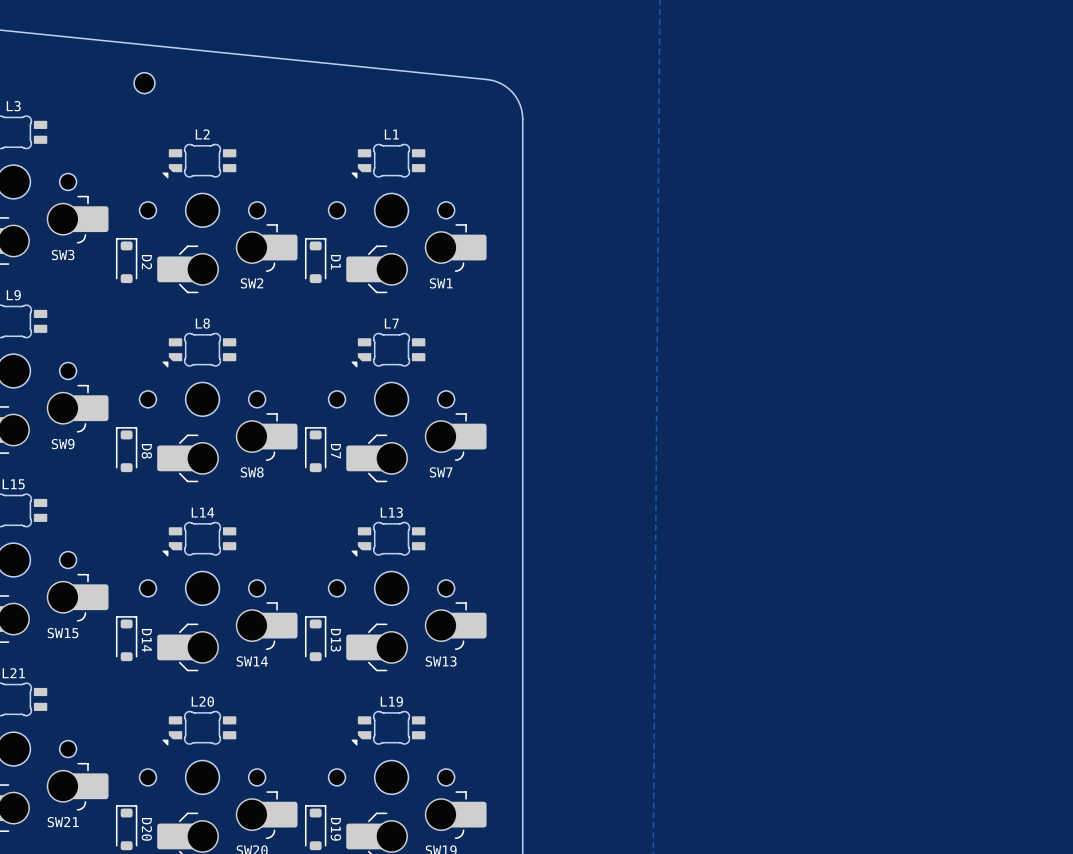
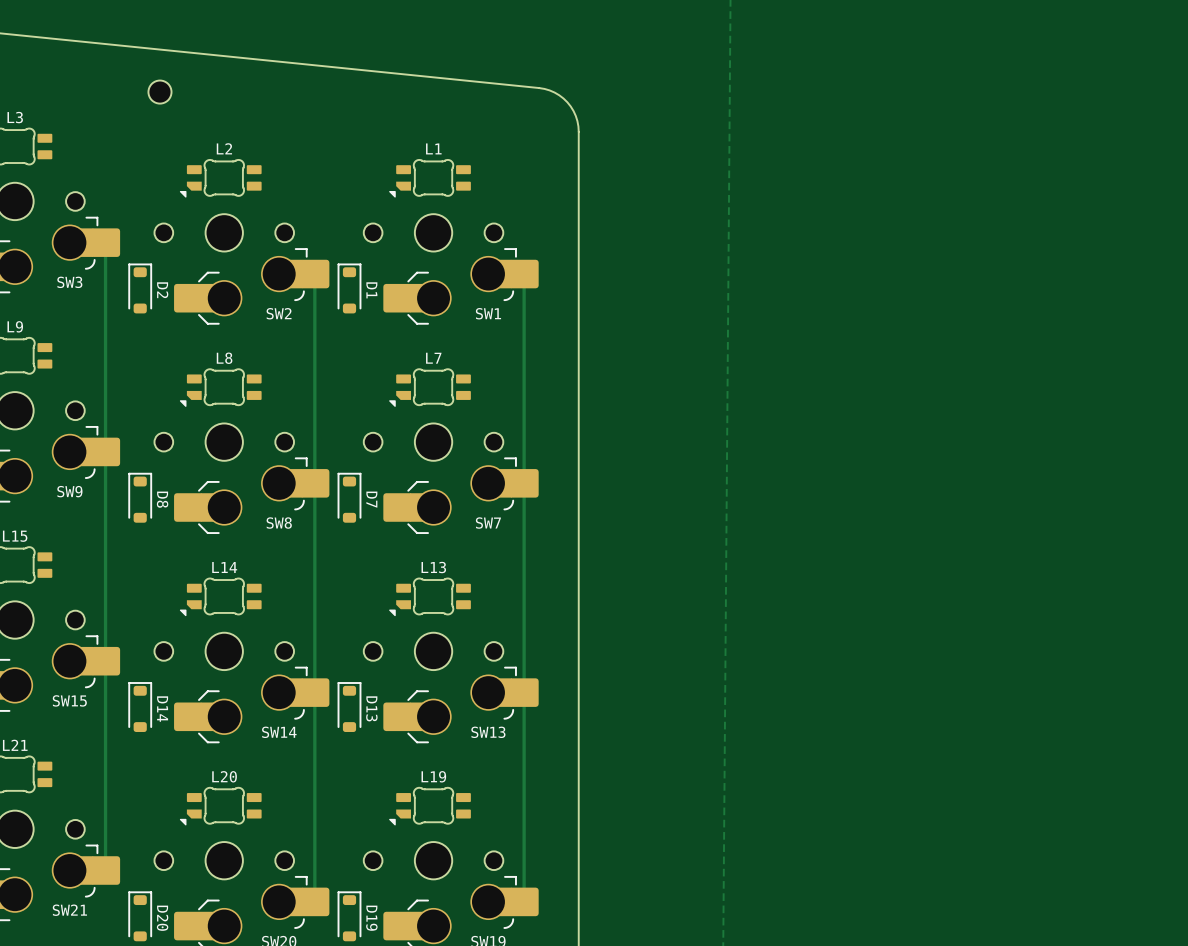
track: none -> (105, 242) (105, 870)
track: none -> (314, 274) (314, 901)
track: none -> (524, 274) (524, 901)

